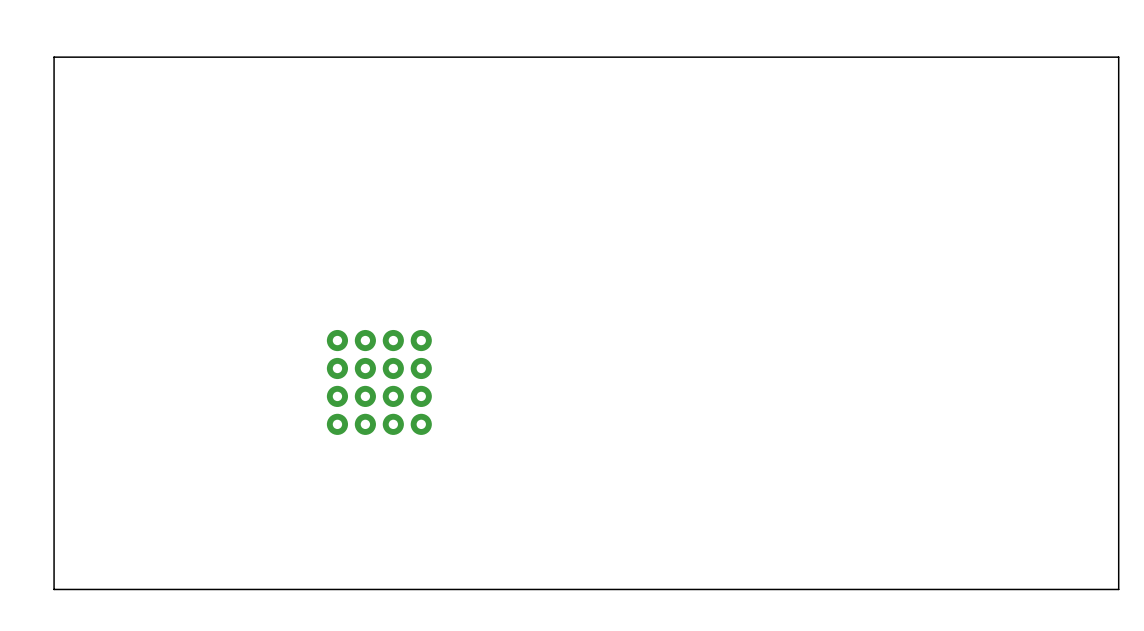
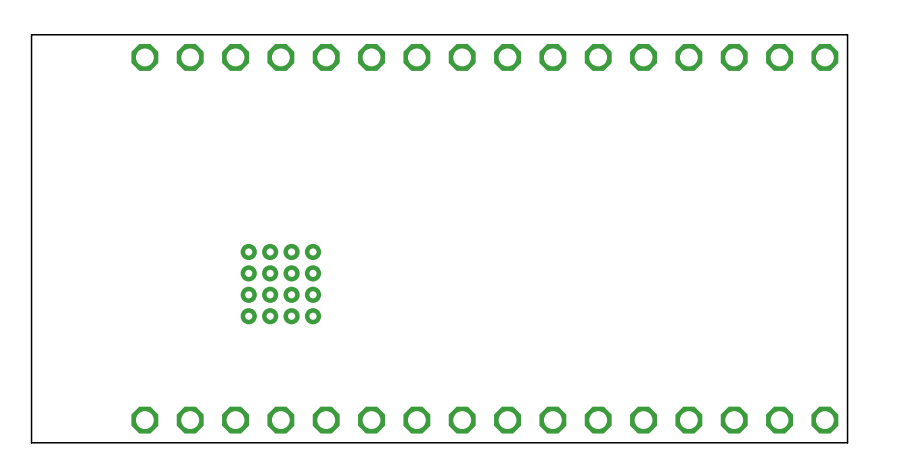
part: none -> (484, 57)
part: none -> (484, 420)

